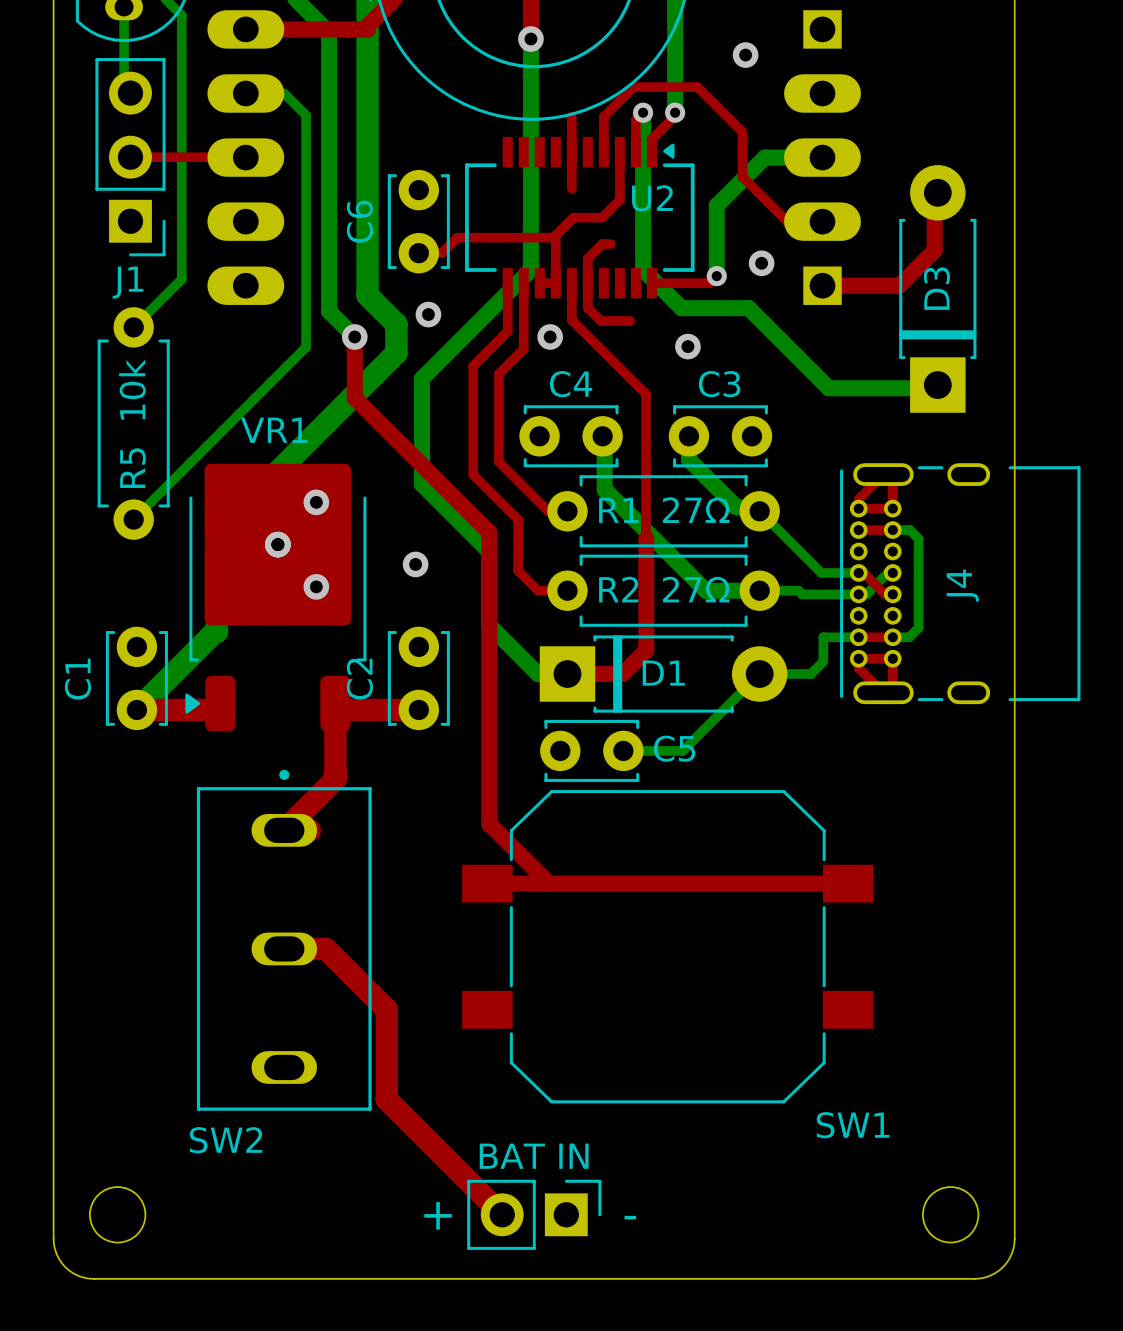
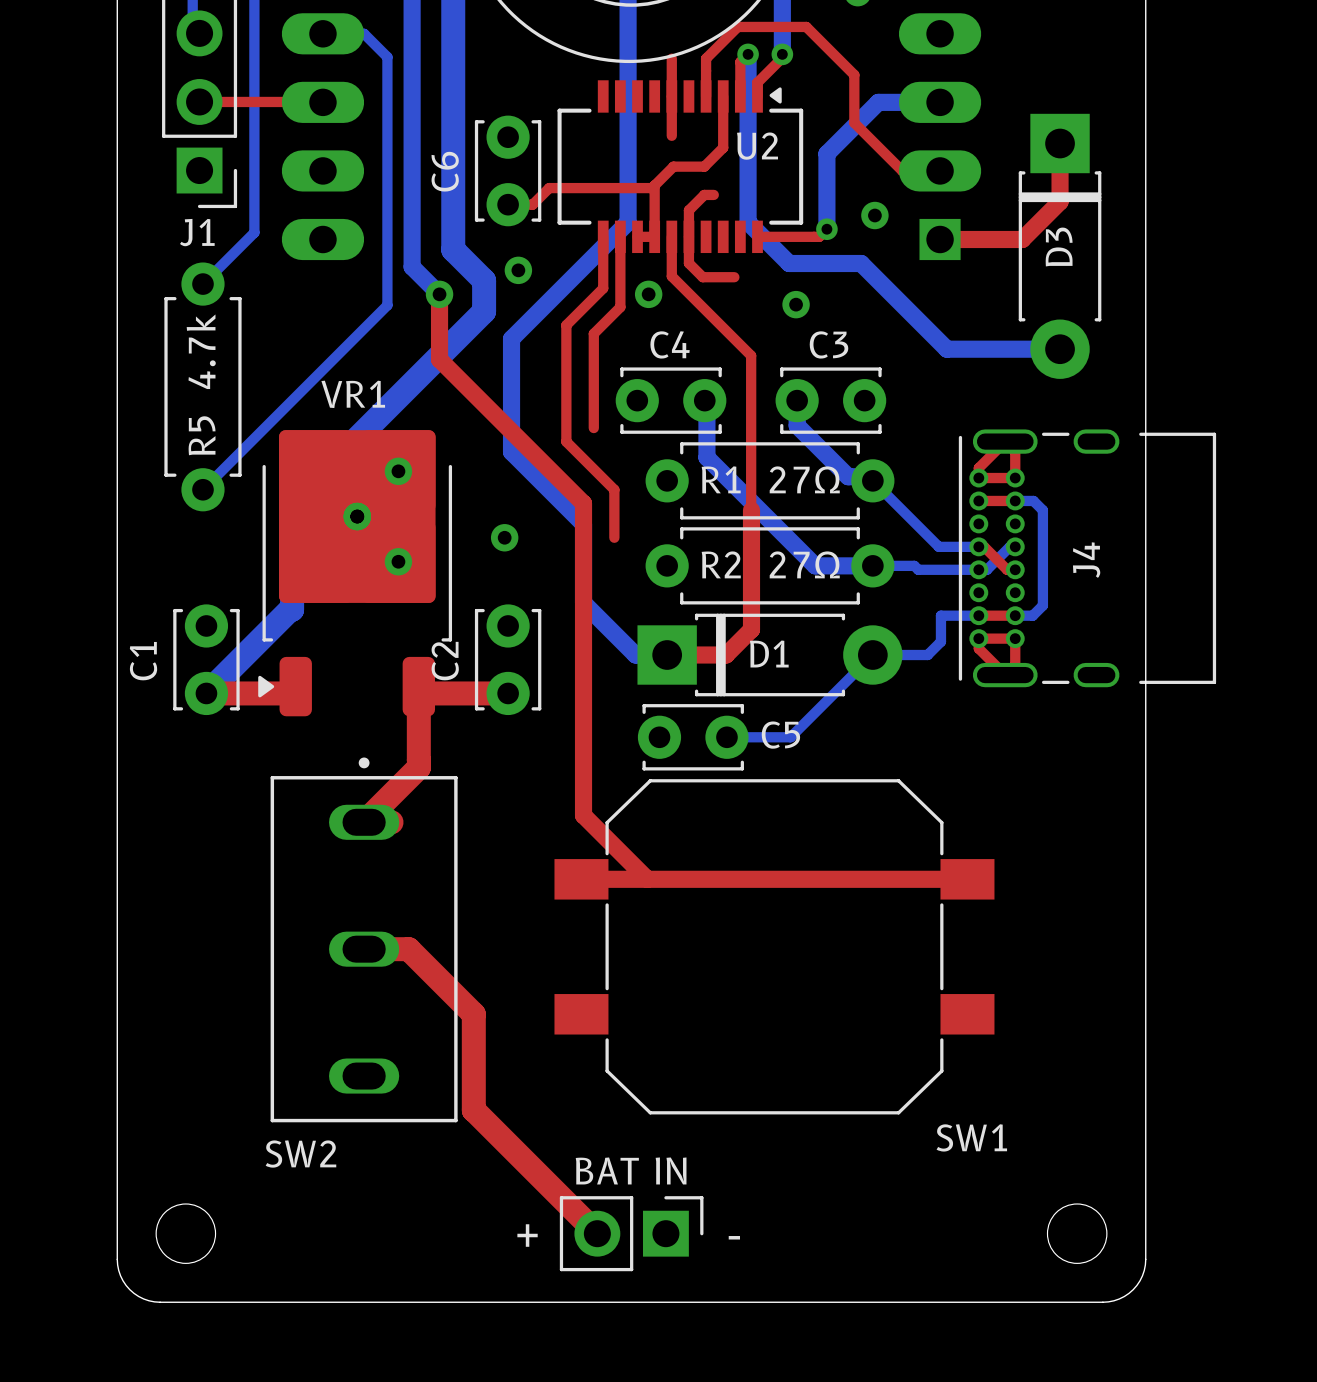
D3 rotation: 0° (937, 288) -> 180° (1060, 246)
R5 value: 10k (132, 389) -> 4.7k (201, 351)
top track: (498, 461) (548, 511) (567, 511) -> none
top track: (518, 564) (518, 570) (538, 590) (567, 590) -> none

